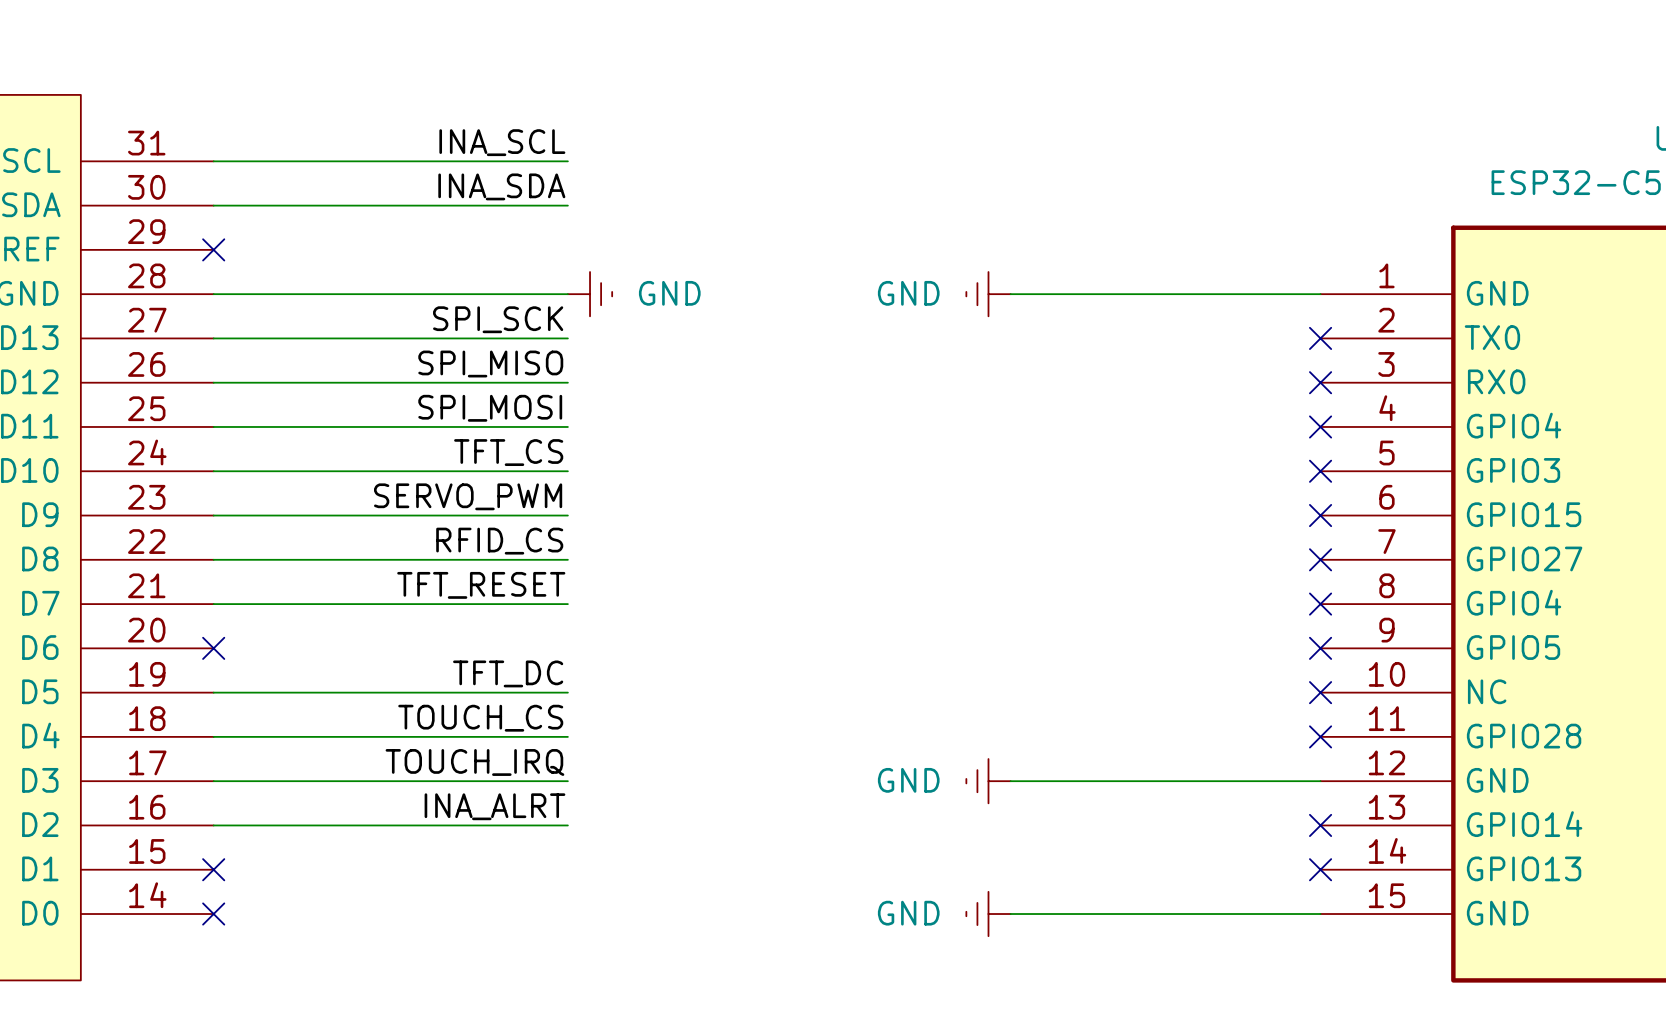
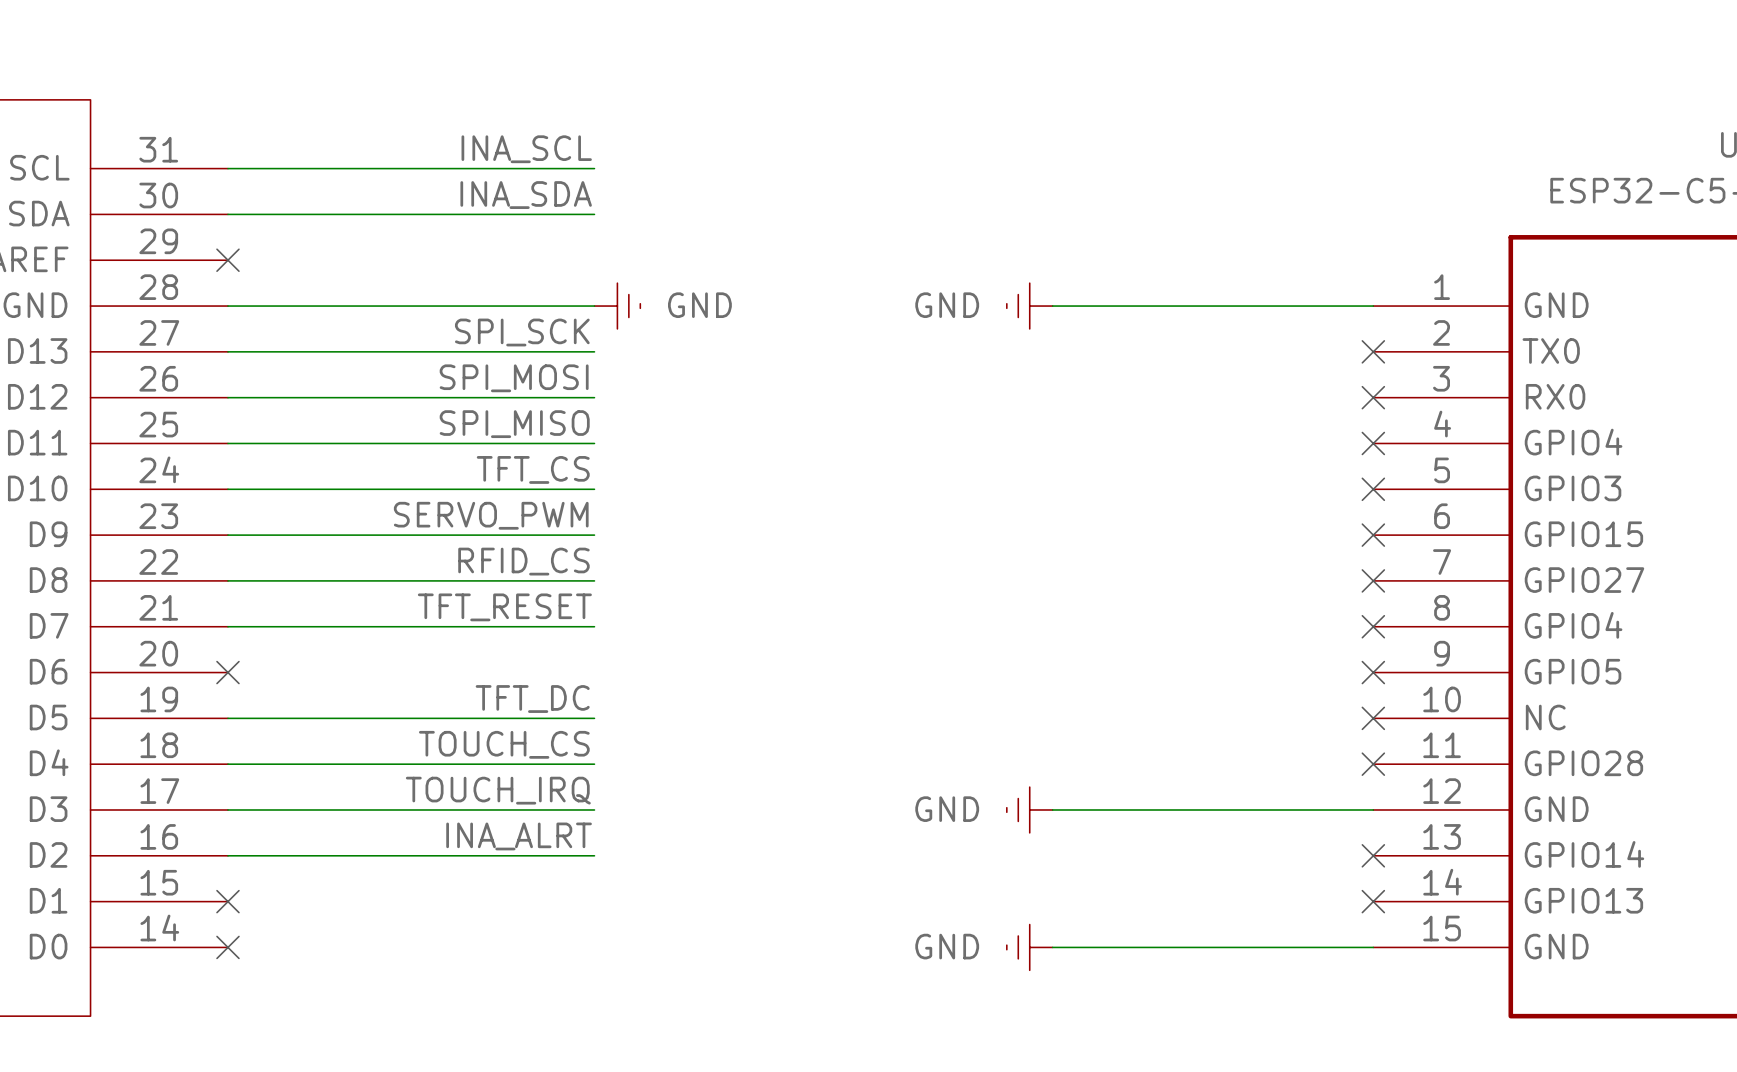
label: SPI_MISO (490, 364) -> SPI_MOSI (514, 378)
label: SPI_MOSI (490, 408) -> SPI_MISO (514, 424)

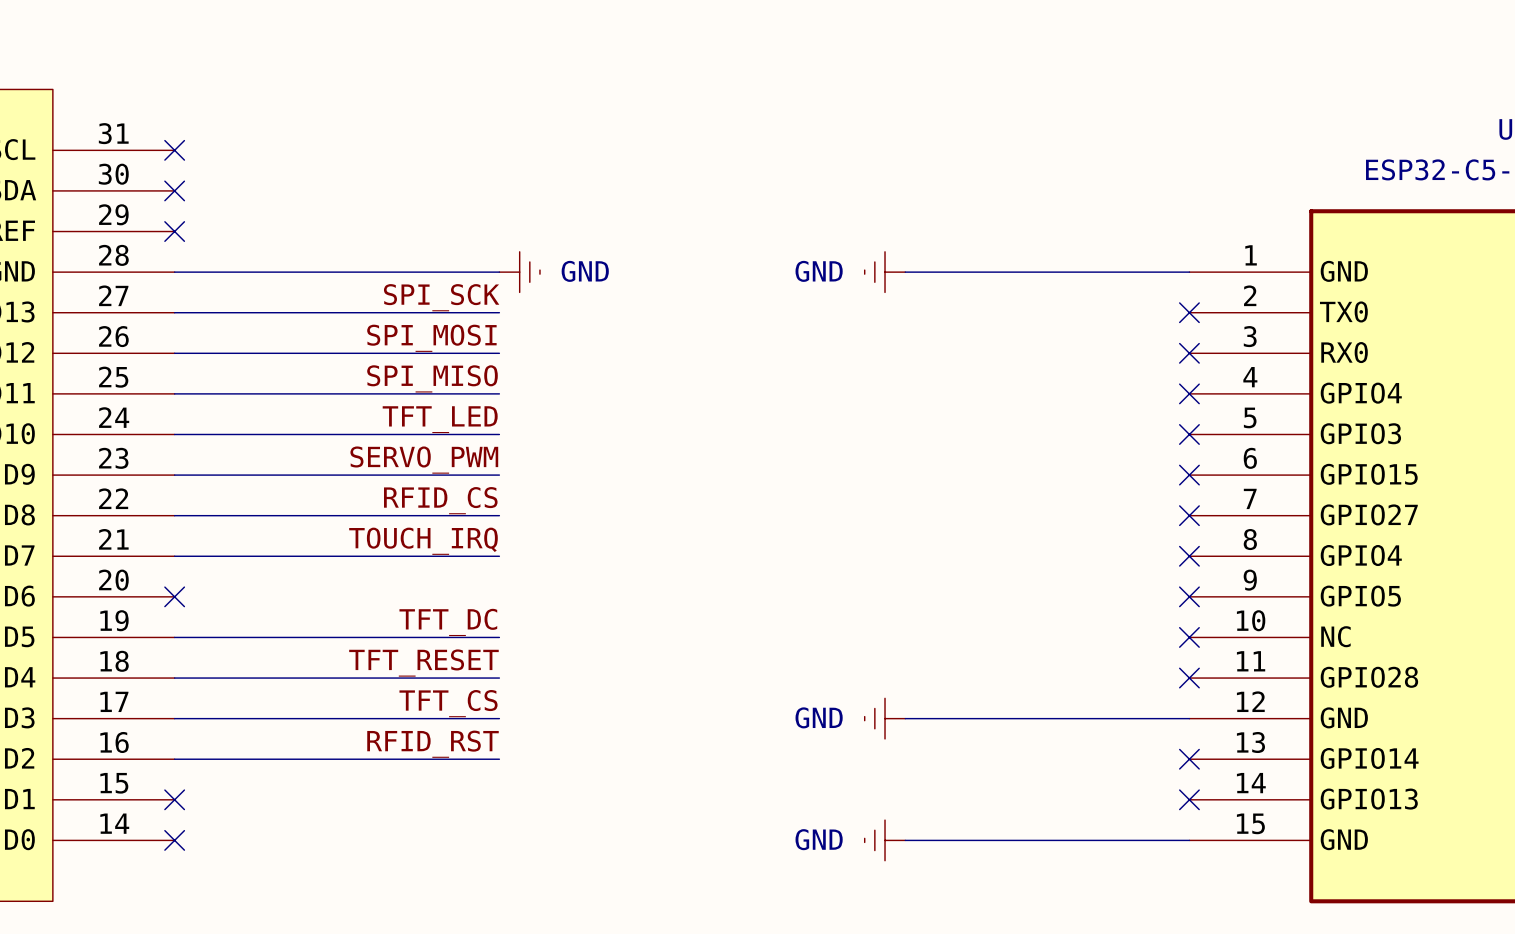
label: INA_SCL (526, 149) -> none
wire: (227, 168) (594, 168) -> none
no-connect mark: none -> (174, 150)
label: INA_SDA (526, 195) -> none
wire: (227, 214) (594, 214) -> none
no-connect mark: none -> (174, 190)
label: TFT_CS (533, 469) -> TFT_LED (440, 419)
label: TFT_RESET (504, 607) -> TOUCH_IRQ (423, 541)
label: TOUCH_CS (504, 744) -> TFT_RESET (423, 663)
label: TOUCH_IRQ (498, 790) -> TFT_CS (448, 703)
label: INA_ALRT (519, 836) -> RFID_RST (432, 744)

